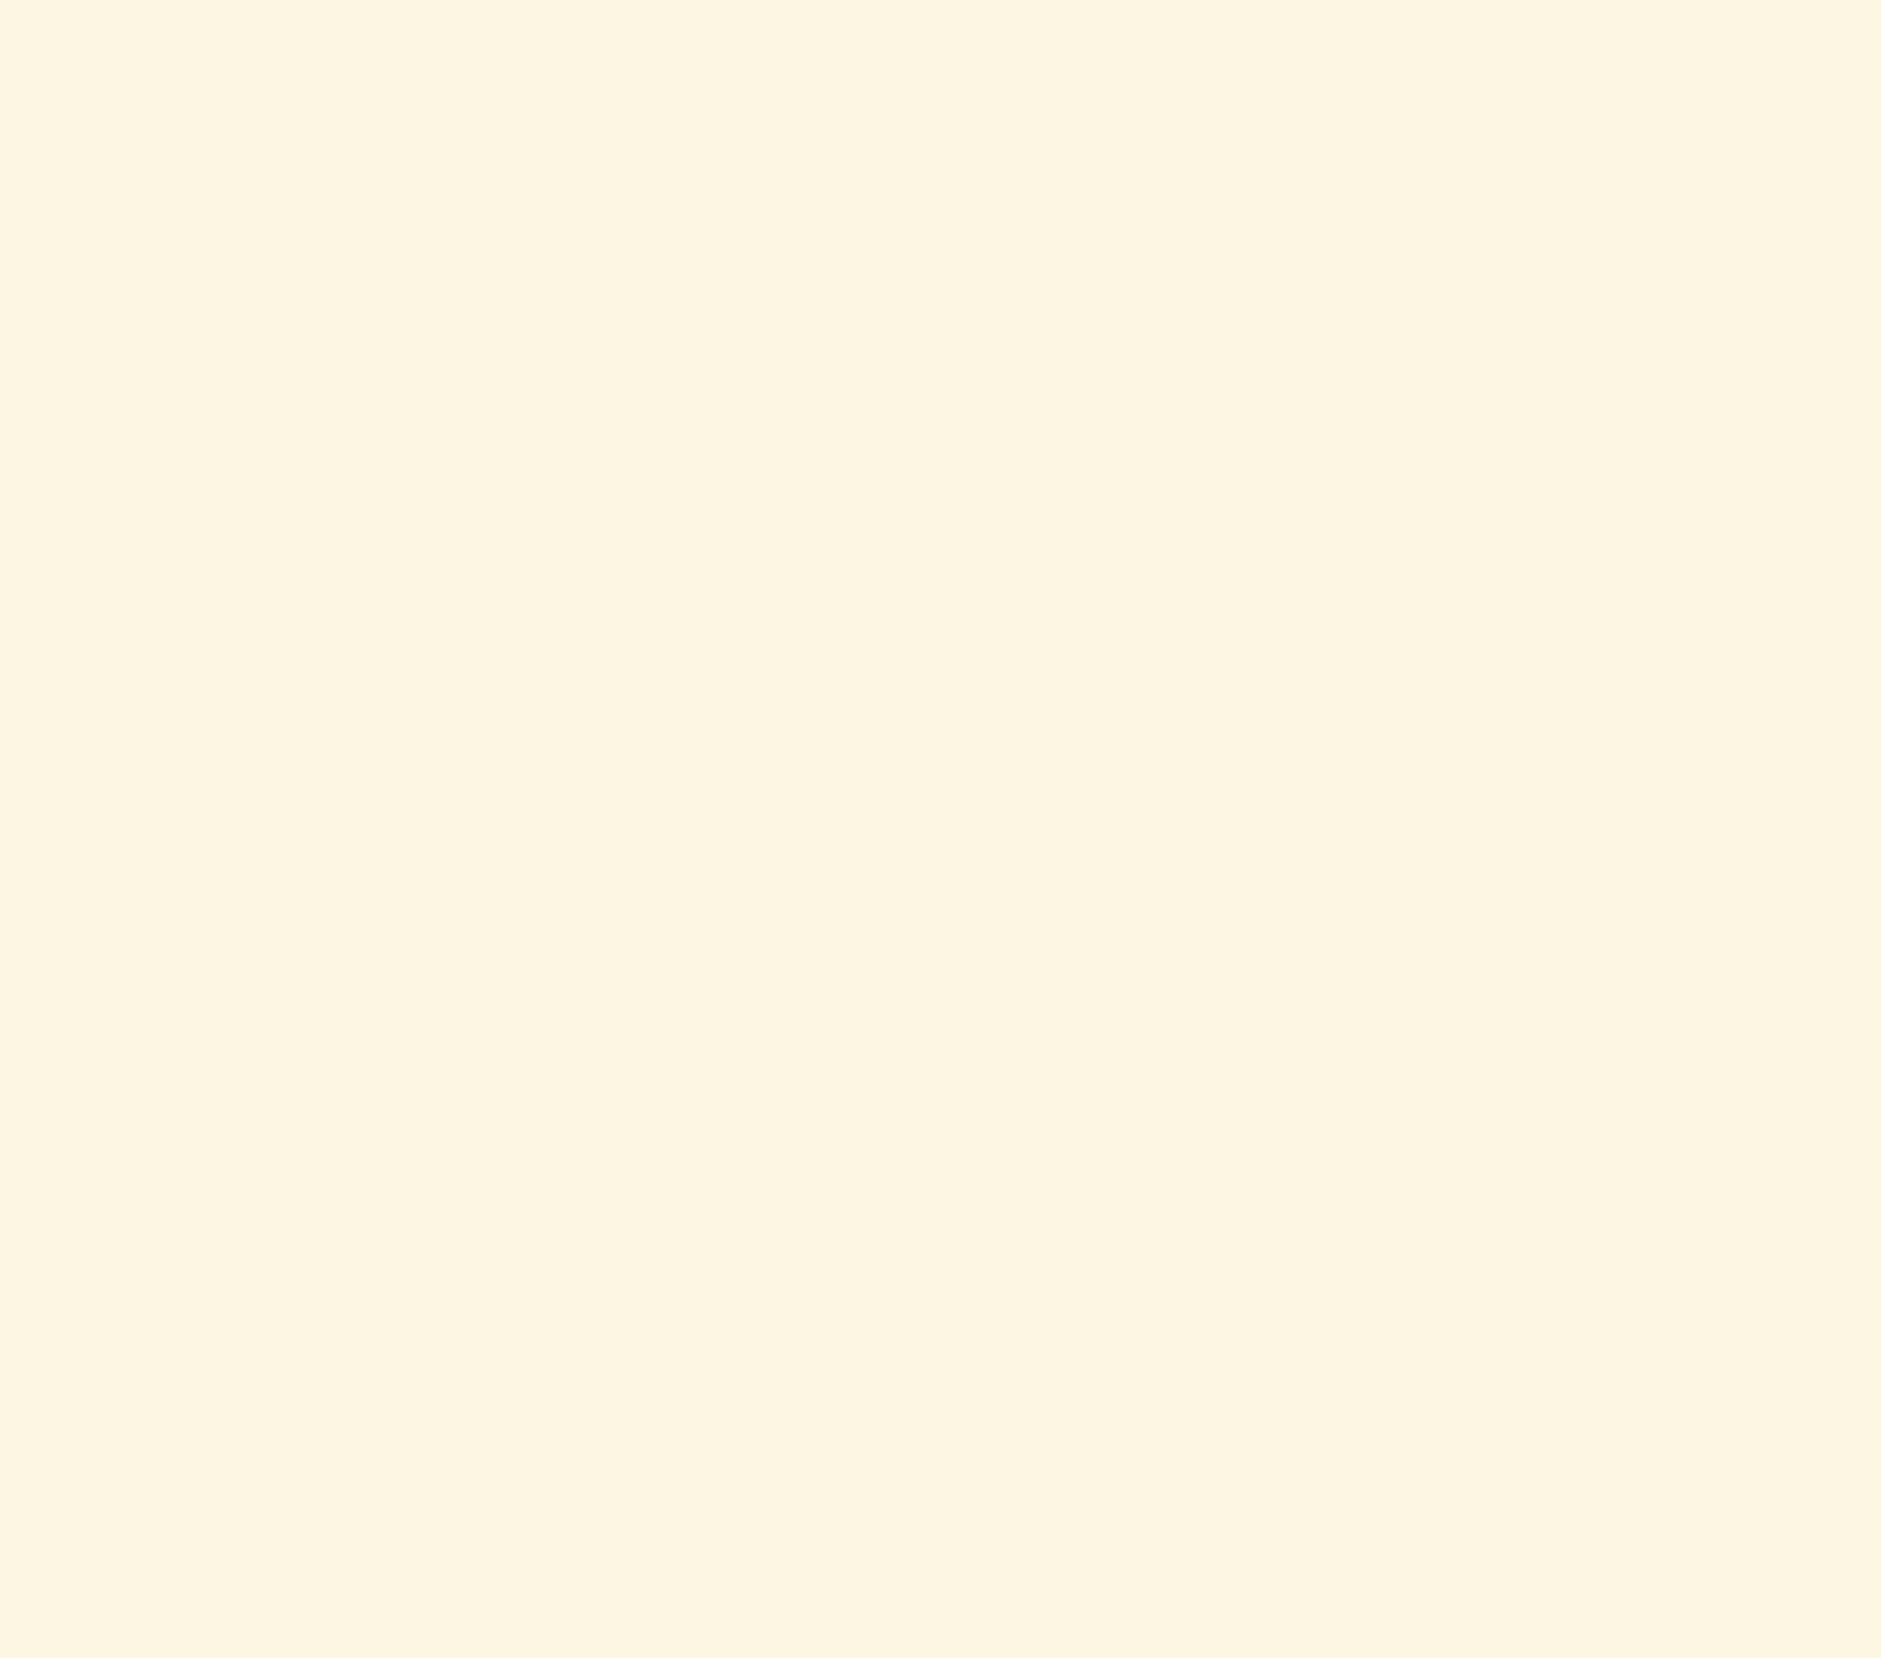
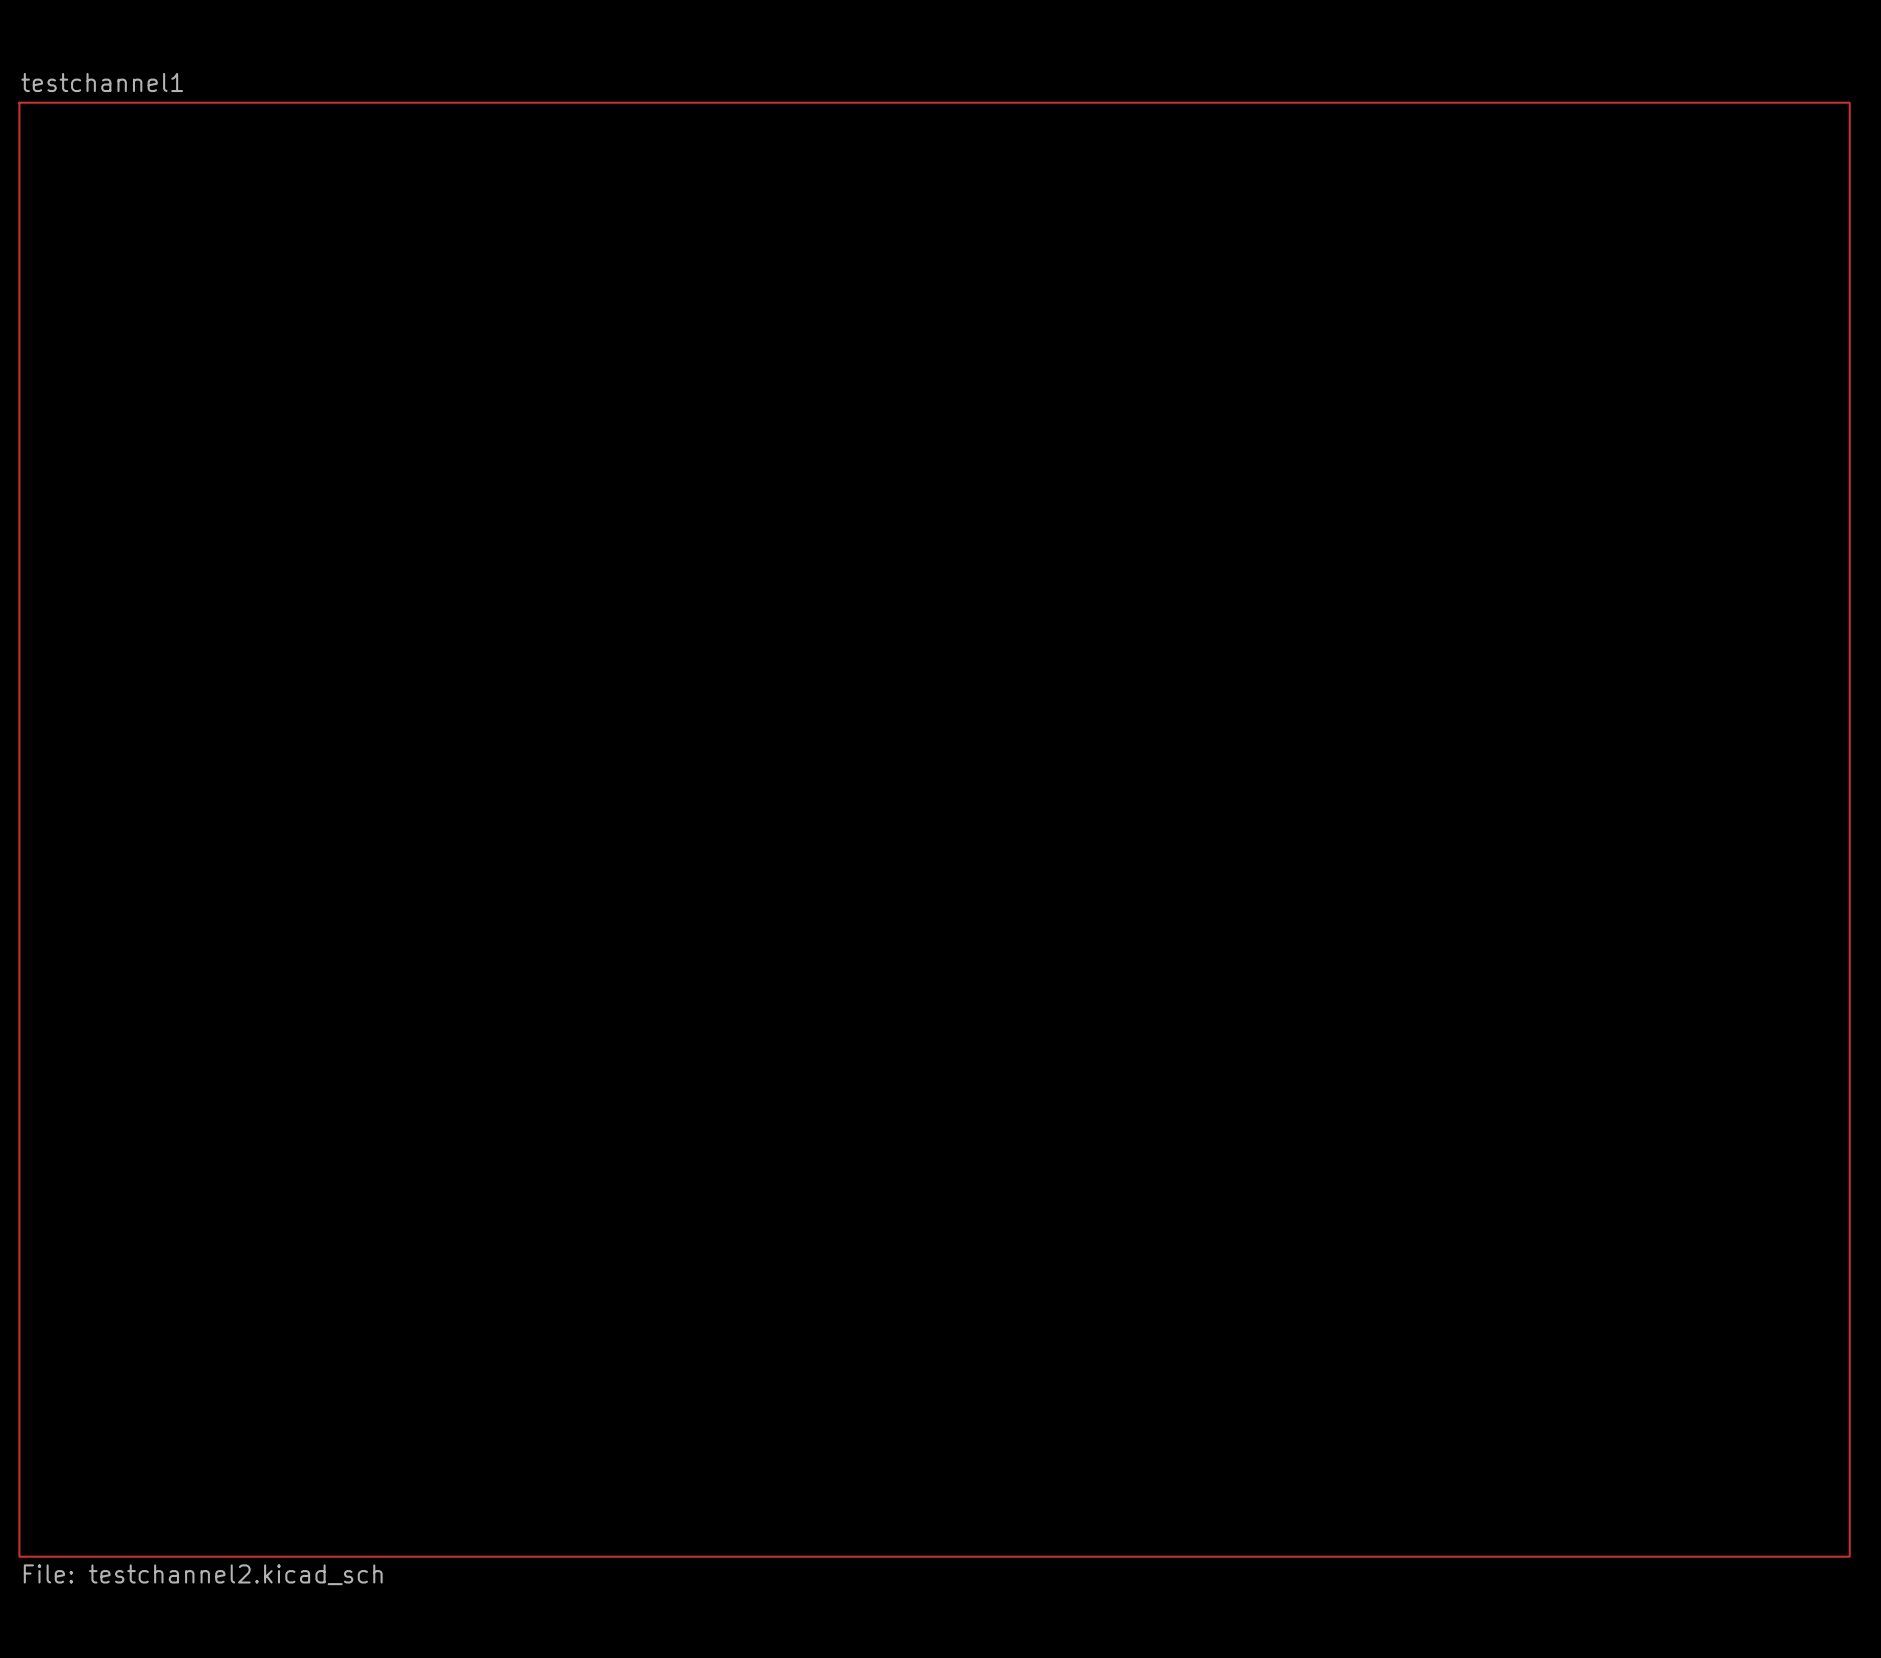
sheet testchannel1: none -> File: testchannel2.kicad_sch (934, 829)

